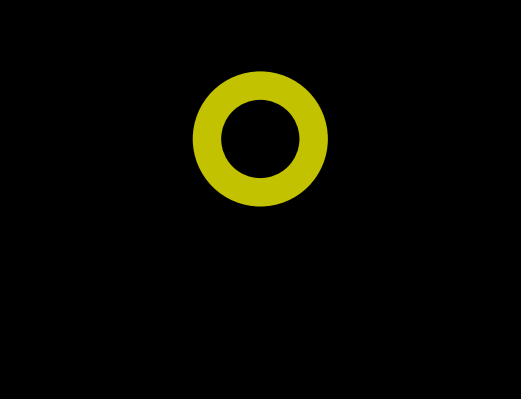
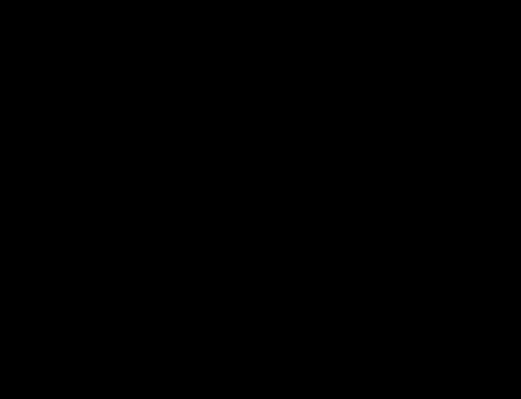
part: (260, 138) -> none

